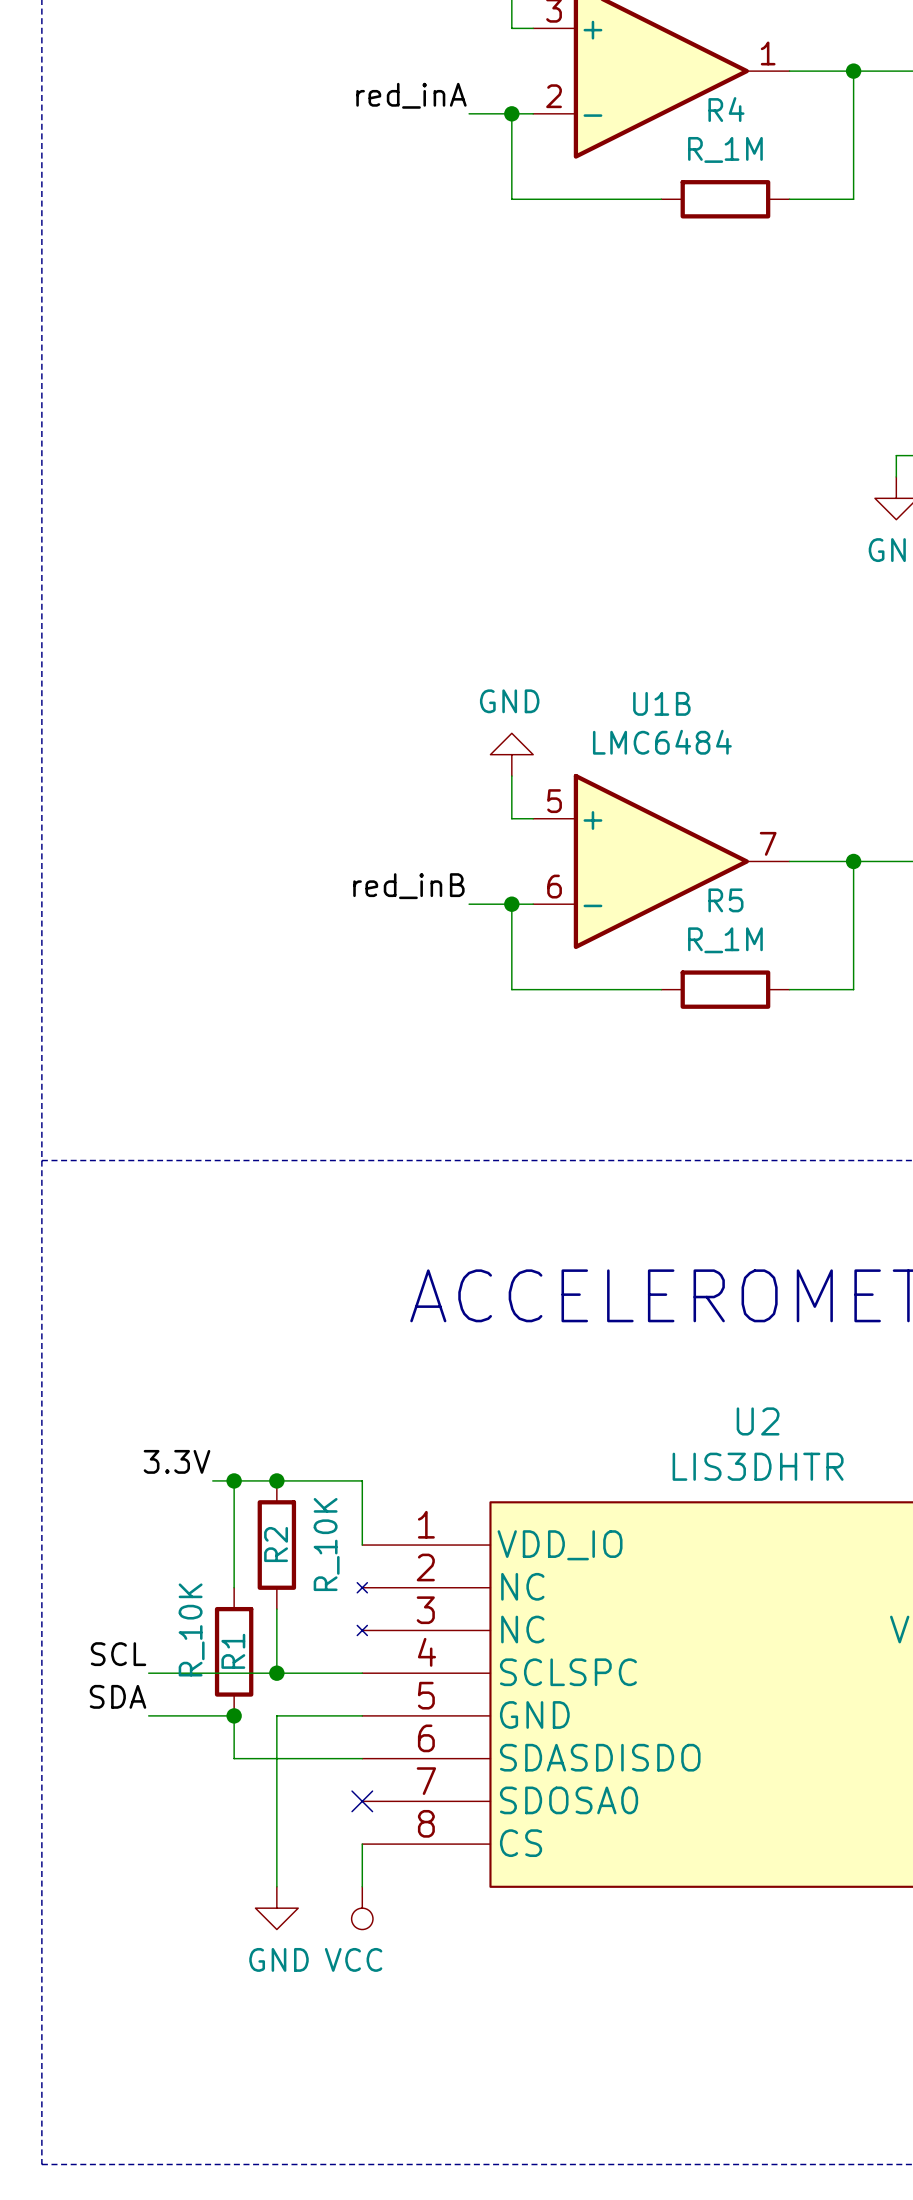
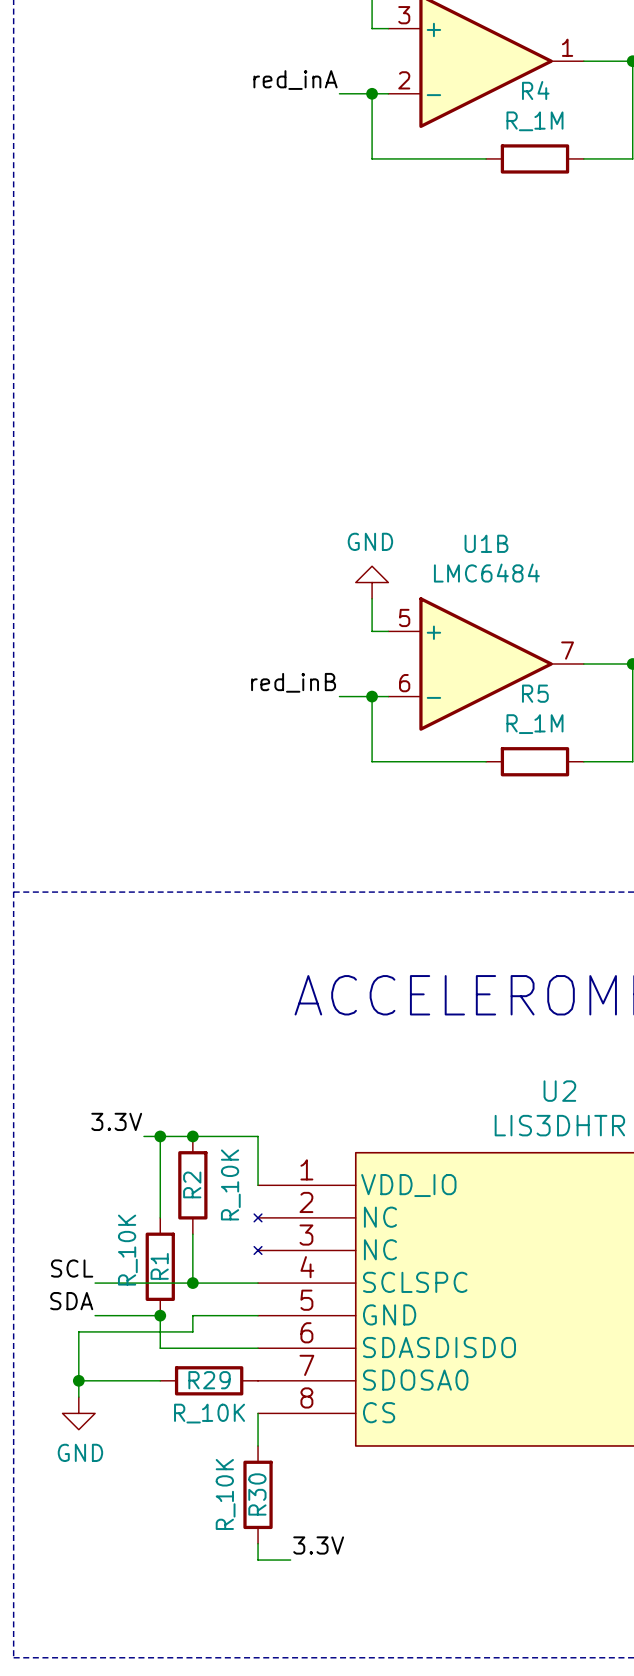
wire: (276, 1737) (276, 1886) -> (192, 1331) (78, 1331) (78, 1397)
wire: none -> (78, 1380) (160, 1380)
junction: none -> (78, 1380)
R29: none -> R_10K (209, 1380)
no-connect mark: (362, 1801) -> none
power symbol position: GND (276, 1908) -> GND (78, 1413)
power symbol: VCC (362, 1908) -> none
R30: none -> R_10K (258, 1494)
wire: none -> (258, 1543) (258, 1560) (290, 1560)
label: none -> 3.3V (318, 1545)

